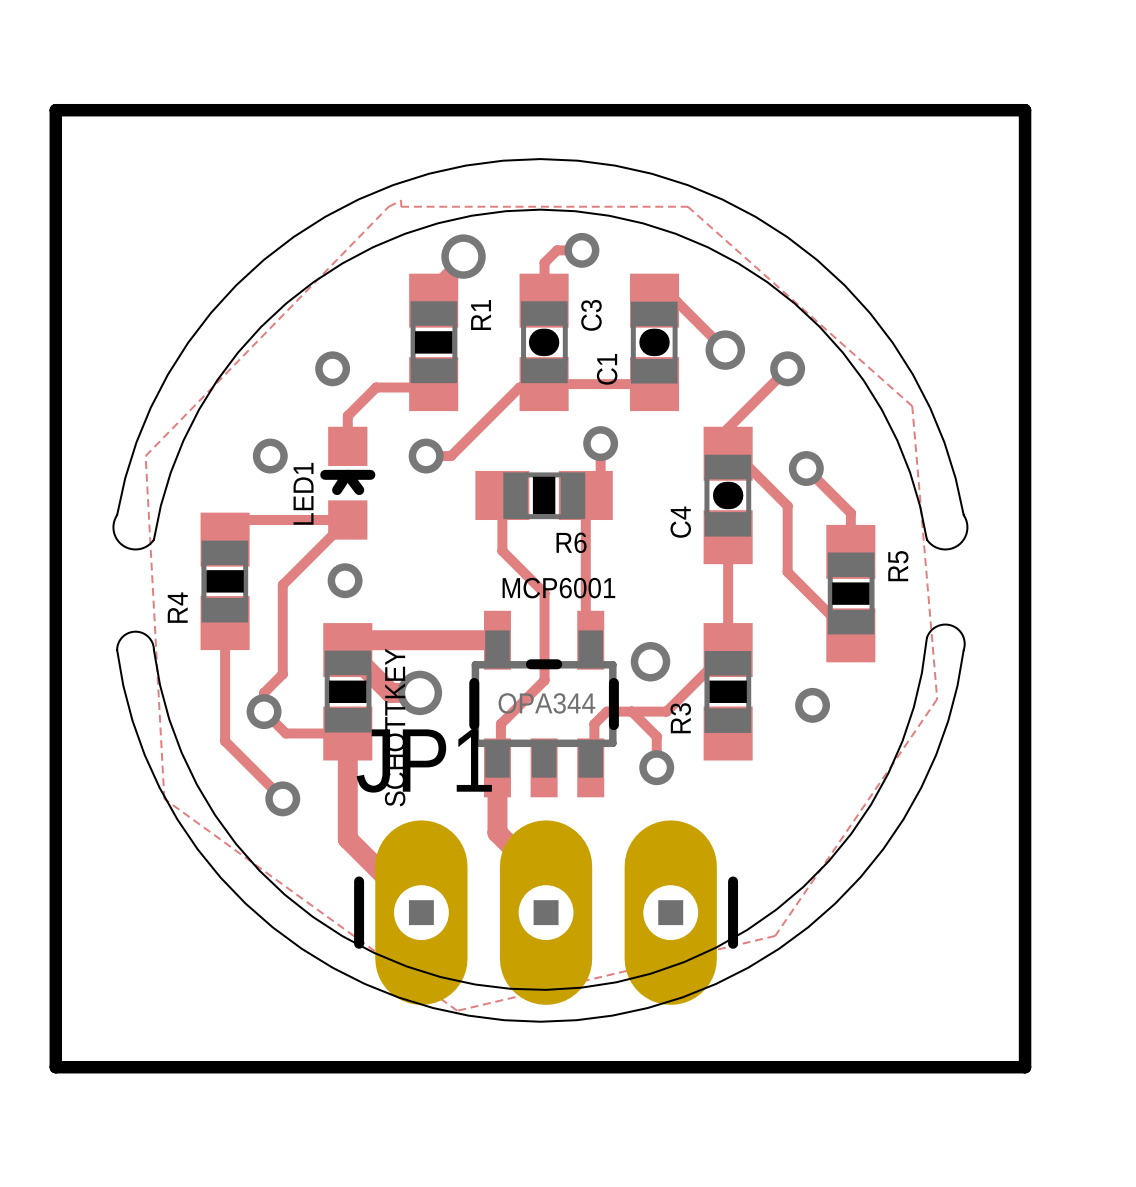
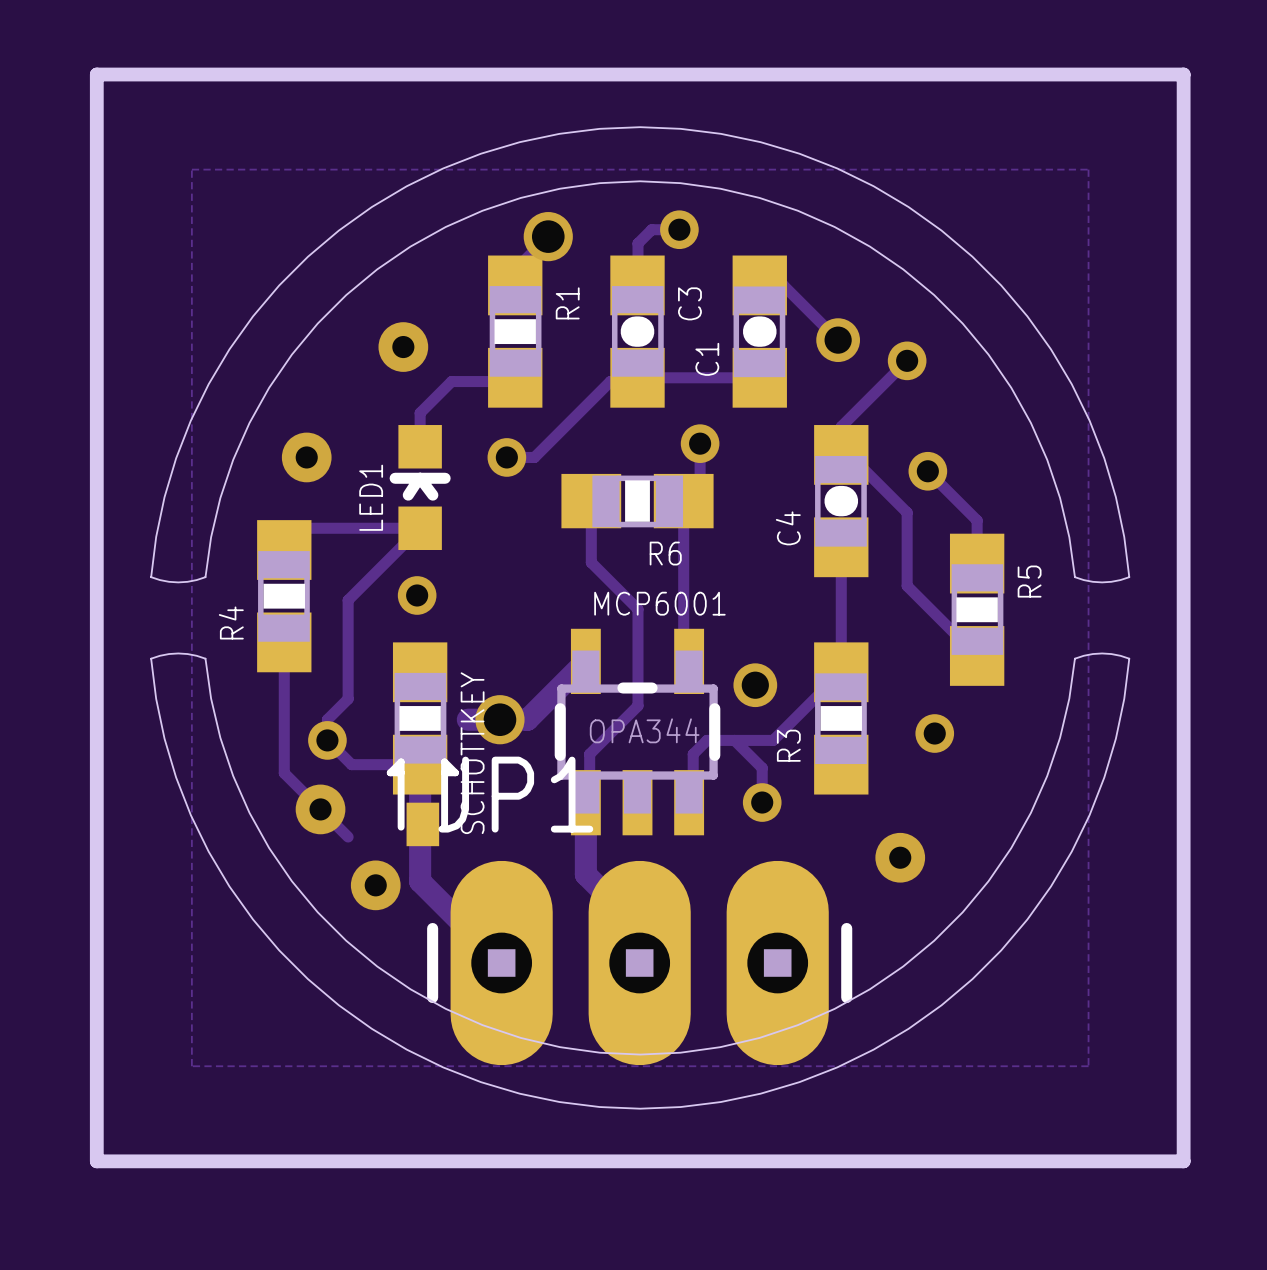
board edge: (1025, 110) (1025, 1067) (55, 1067) -> (1170, 74) (1183, 74) (1183, 1161) (96, 1161) (96, 1134)
zone outline: (401, 200) (388, 206) (145, 456) (164, 798) (457, 1010) (775, 935) (937, 699) (912, 406) (687, 206) (401, 206) (401, 200) -> (191, 169) (191, 1066) (1088, 1066) (1088, 169) (191, 169)
via size: [315, 351, 351, 387] -> [378, 322, 429, 372]
via position: (270, 456) -> (306, 457)
board edge: (117, 515) (125, 478) (136, 442) (150, 407) (167, 374) (188, 342) (210, 313) (236, 285) (263, 259) (293, 237) (325, 216) (358, 199) (393, 185) (429, 173) (465, 165) (502, 160) (540, 159) (577, 160) (615, 165) (651, 173) (687, 185) (722, 199) (755, 216) (787, 237) (816, 259) (844, 285) (869, 313) (892, 342) (912, 374) (930, 407) (944, 442) (955, 478) (967, 528) (963, 539) (952, 548) (938, 548) (928, 541) (910, 472) (897, 440) (881, 409) (863, 380) (842, 352) (819, 326) (794, 303) (767, 282) (738, 263) (707, 247) (675, 233) (642, 223) (609, 215) (574, 211) (540, 209) (505, 211) (471, 215) (437, 223) (405, 233) (373, 247) (342, 263) (313, 282) (286, 303) (261, 326) (237, 352) (217, 380) (199, 409) (183, 440) (170, 472) (152, 541) (145, 547) (137, 549) (128, 548) (120, 544) (115, 537) (113, 528) (117, 515) -> (151, 577) (156, 536) (164, 497) (176, 458) (190, 420) (208, 384) (229, 349) (253, 316) (279, 285) (307, 256) (338, 230) (371, 207) (406, 186) (443, 168) (480, 153) (519, 142) (559, 133) (599, 128) (640, 127) (680, 128) (720, 133) (760, 142) (799, 153) (837, 168) (873, 186) (908, 207) (941, 230) (972, 256) (1001, 285) (1027, 316) (1050, 349) (1071, 384) (1089, 420) (1104, 458) (1115, 497) (1124, 536) (1129, 577) (1102, 582) (1074, 577) (1069, 537) (1060, 498) (1047, 459) (1030, 422) (1011, 387) (988, 354) (962, 323) (934, 295) (903, 269) (869, 246) (834, 227) (797, 210) (759, 197) (720, 188) (680, 183) (640, 181) (599, 183) (560, 188) (520, 197) (482, 210) (445, 227) (410, 246) (377, 269) (346, 295) (317, 323) (291, 354) (269, 387) (249, 422) (233, 459) (220, 498) (211, 537) (205, 577) (178, 582) (151, 577)
board edge: (926, 637) (934, 627) (946, 624) (958, 629) (964, 640) (957, 685) (948, 720) (936, 754) (921, 787) (903, 819) (883, 849) (860, 877) (835, 903) (808, 927) (779, 948) (748, 967) (715, 983) (682, 997) (647, 1008) (612, 1015) (576, 1020) (540, 1021) (504, 1020) (468, 1015) (433, 1008) (398, 997) (364, 983) (332, 967) (301, 948) (272, 927) (245, 903) (220, 877) (197, 849) (177, 819) (159, 787) (144, 754) (132, 720) (123, 685) (117, 650) (119, 640) (128, 633) (140, 632) (150, 638) (153, 645) (160, 685) (169, 719) (181, 752) (196, 784) (215, 815) (235, 843) (259, 870) (284, 894) (312, 916) (342, 936) (373, 952) (406, 966) (440, 977) (475, 984) (510, 988) (545, 989) (581, 987) (616, 982) (650, 973) (684, 962) (716, 947) (747, 929) (776, 909) (803, 886) (828, 861) (851, 833) (871, 804) (888, 773) (902, 741) (913, 707) (921, 672) (926, 637) -> (151, 658) (156, 698) (164, 738) (176, 777) (190, 815) (208, 851) (229, 886) (253, 919) (279, 950) (307, 979) (338, 1005) (371, 1028) (406, 1049) (443, 1067) (480, 1082) (519, 1093) (559, 1102) (599, 1107) (640, 1108) (680, 1107) (720, 1102) (760, 1093) (799, 1082) (837, 1067) (873, 1049) (908, 1028) (941, 1005) (972, 979) (1001, 950) (1027, 919) (1050, 886) (1071, 851) (1089, 815) (1104, 777) (1115, 738) (1124, 698) (1129, 658) (1102, 653) (1074, 658) (1069, 698) (1060, 737) (1047, 776) (1030, 812) (1011, 848) (988, 881) (962, 912) (934, 940) (903, 966) (869, 989) (834, 1008) (797, 1025) (759, 1037) (720, 1047) (680, 1052) (640, 1054) (599, 1052) (560, 1047) (520, 1037) (482, 1025) (445, 1008) (410, 989) (377, 966) (346, 940) (317, 912) (291, 881) (269, 848) (249, 812) (233, 776) (220, 737) (211, 698) (205, 658) (178, 653) (151, 658)
track: (497, 640) (357, 640) (347, 650) (390, 692) -> (585, 661) (527, 719) (499, 719)
part: none -> (422, 794)
via position: (282, 798) -> (320, 809)
via: none -> (900, 857)
via: none -> (375, 885)

